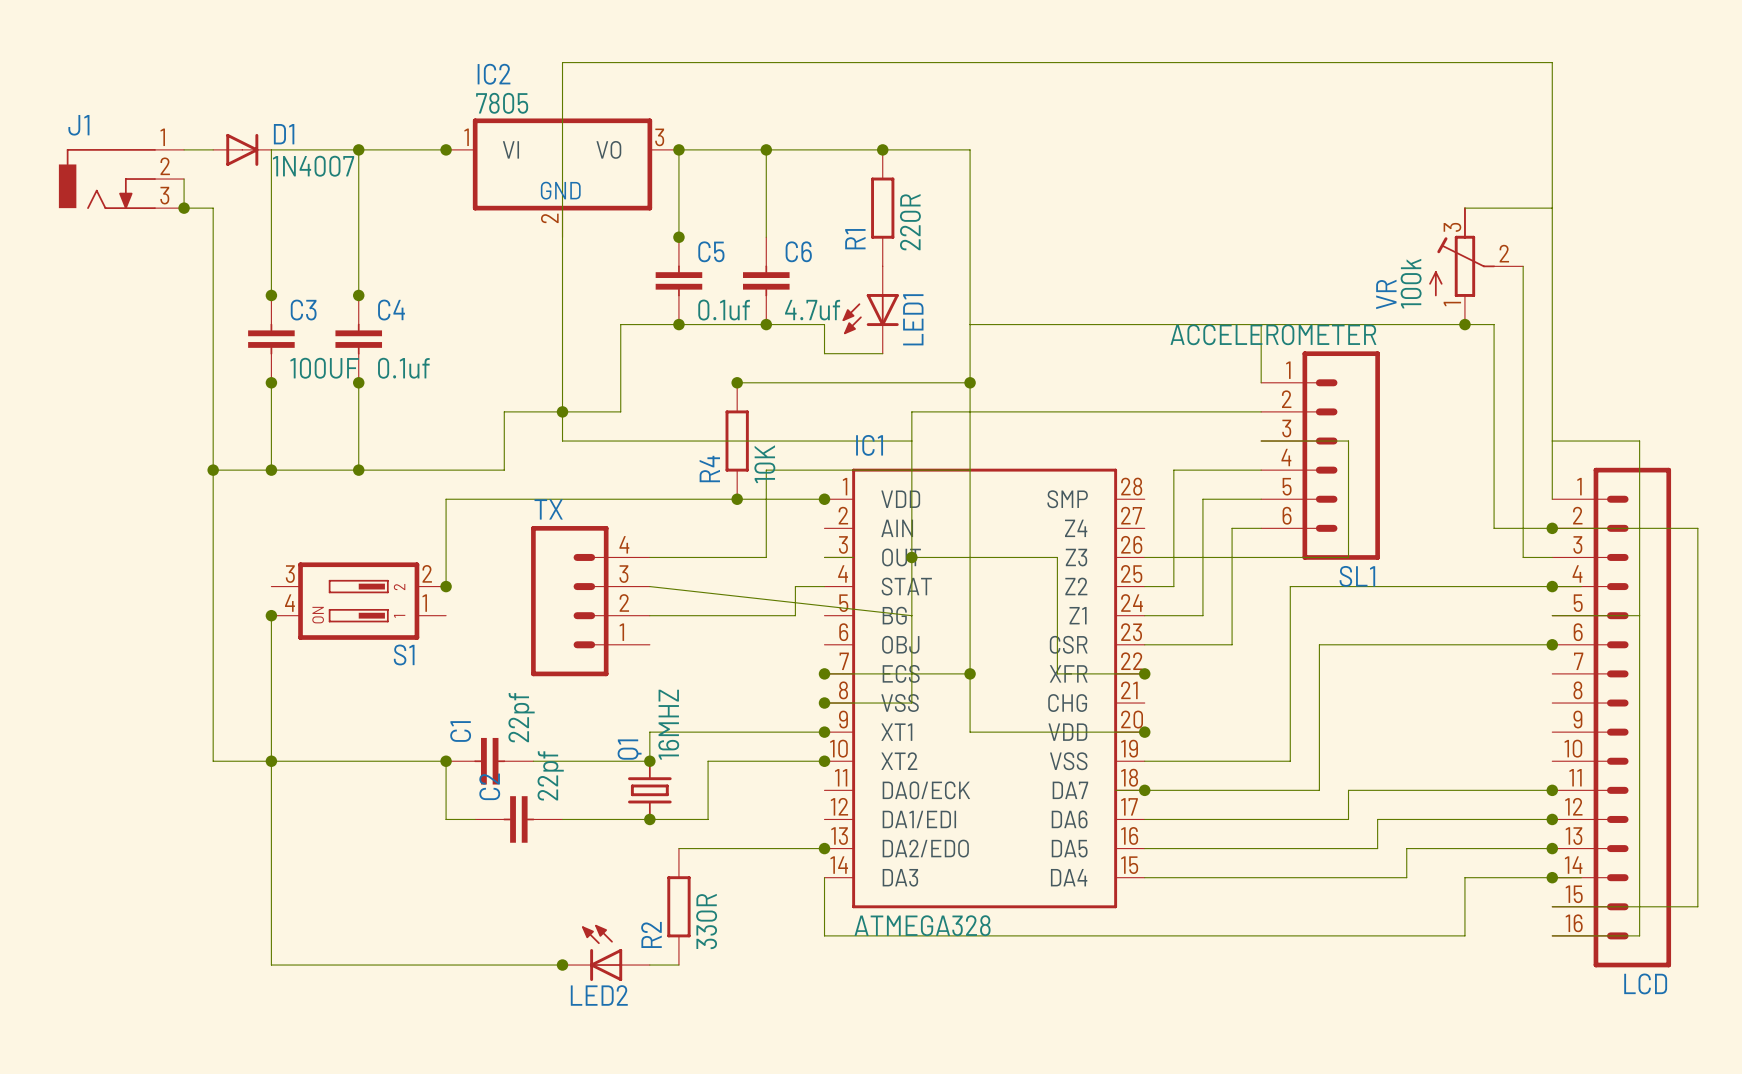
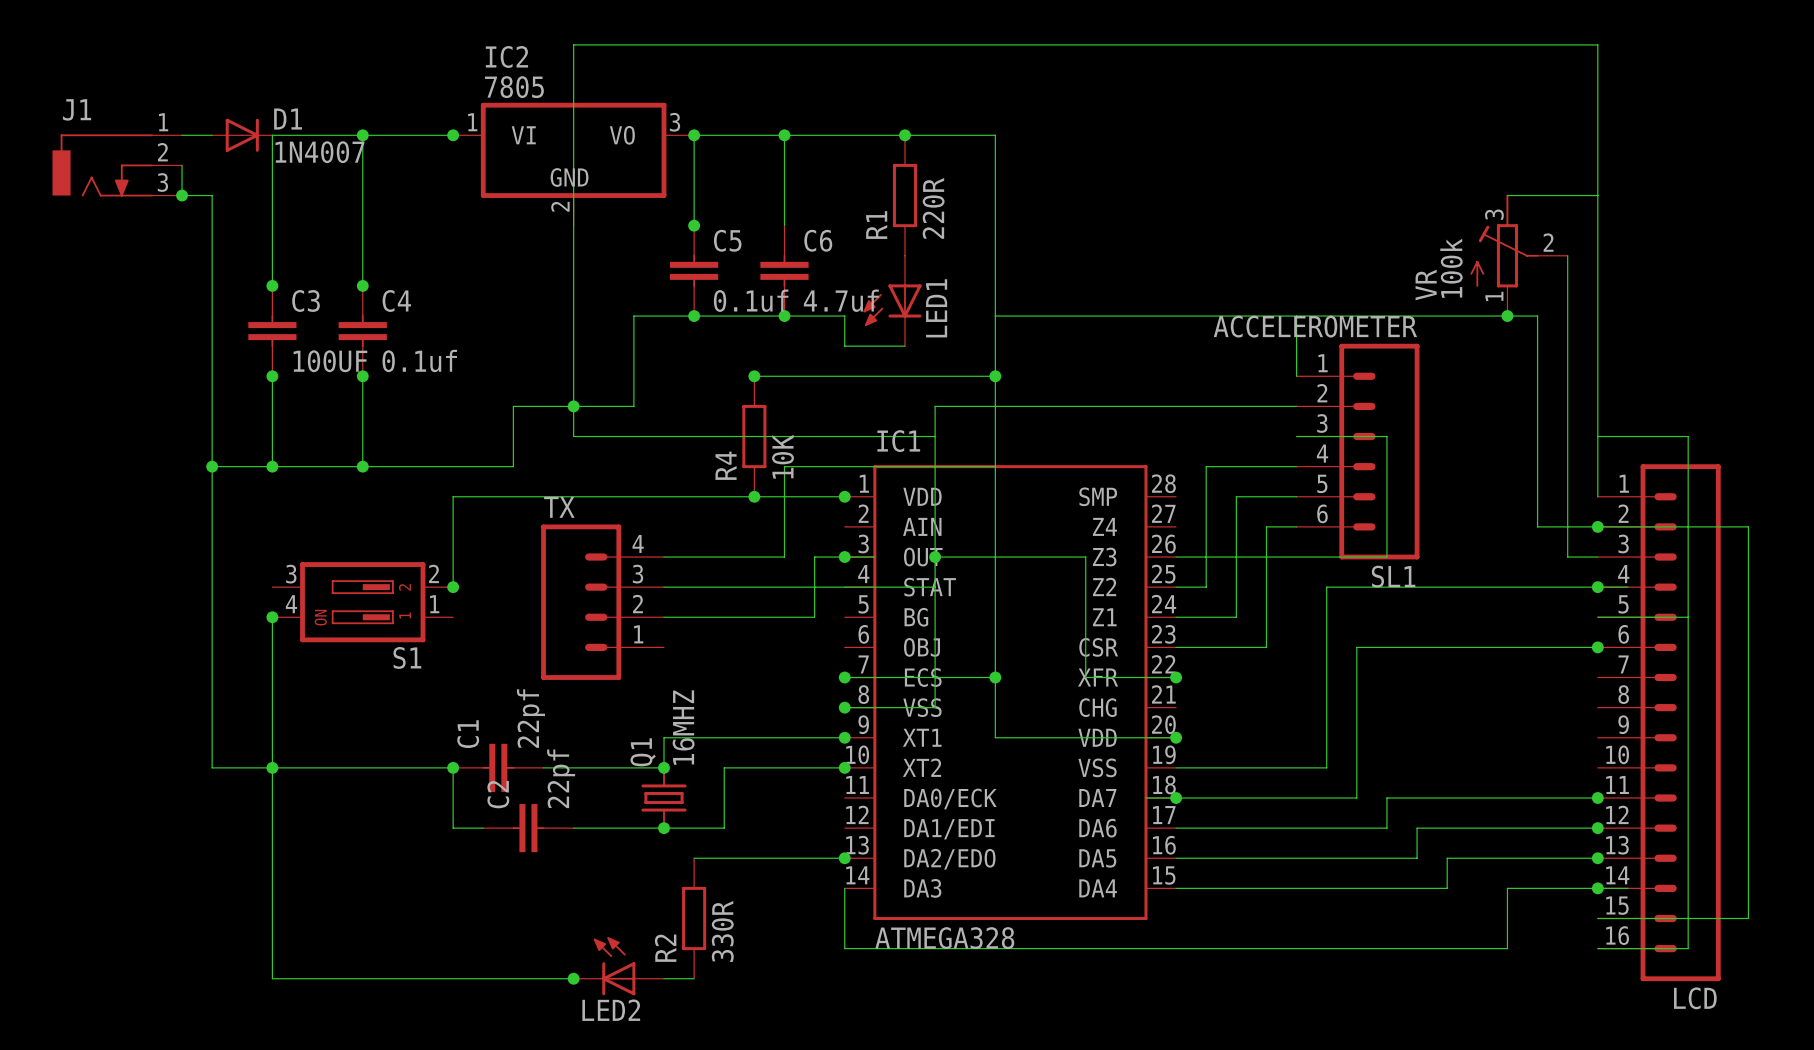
junction: none -> (844, 557)
wire: (649, 586) (911, 615) -> (664, 587) (814, 587) (814, 557) (844, 557)
wire: none -> (844, 587) (935, 587)

